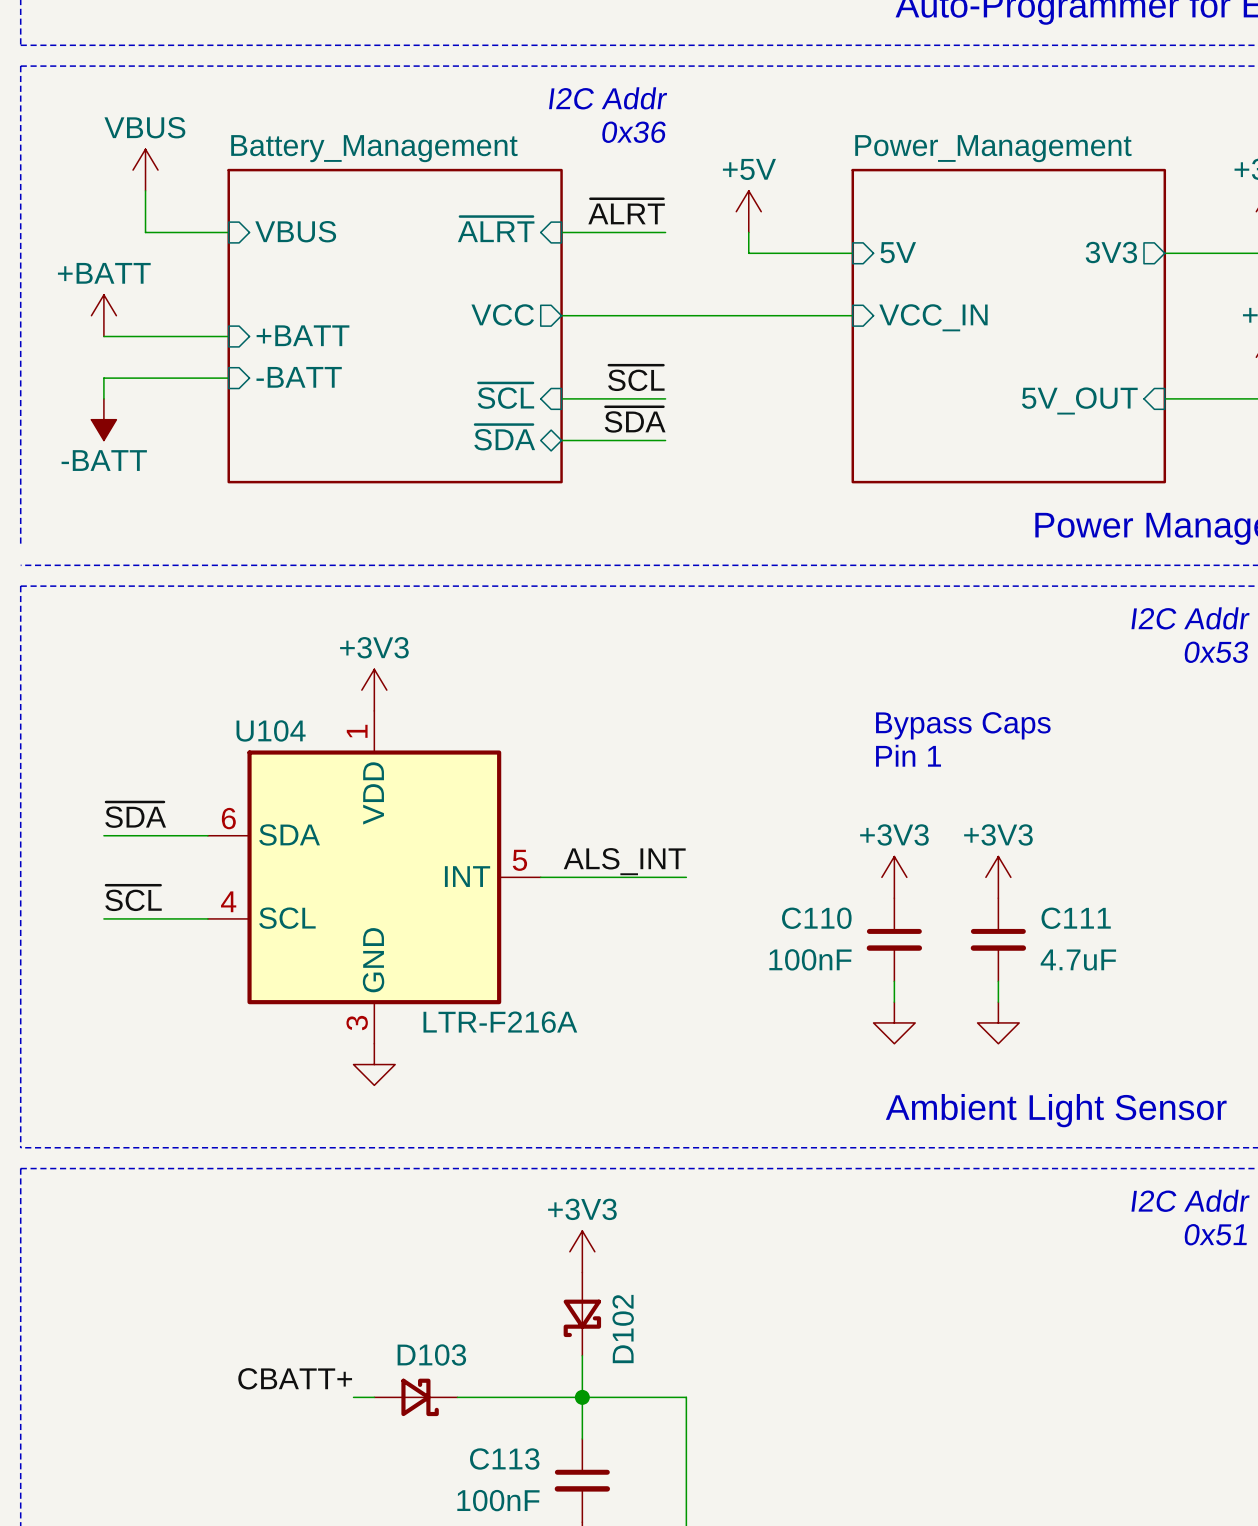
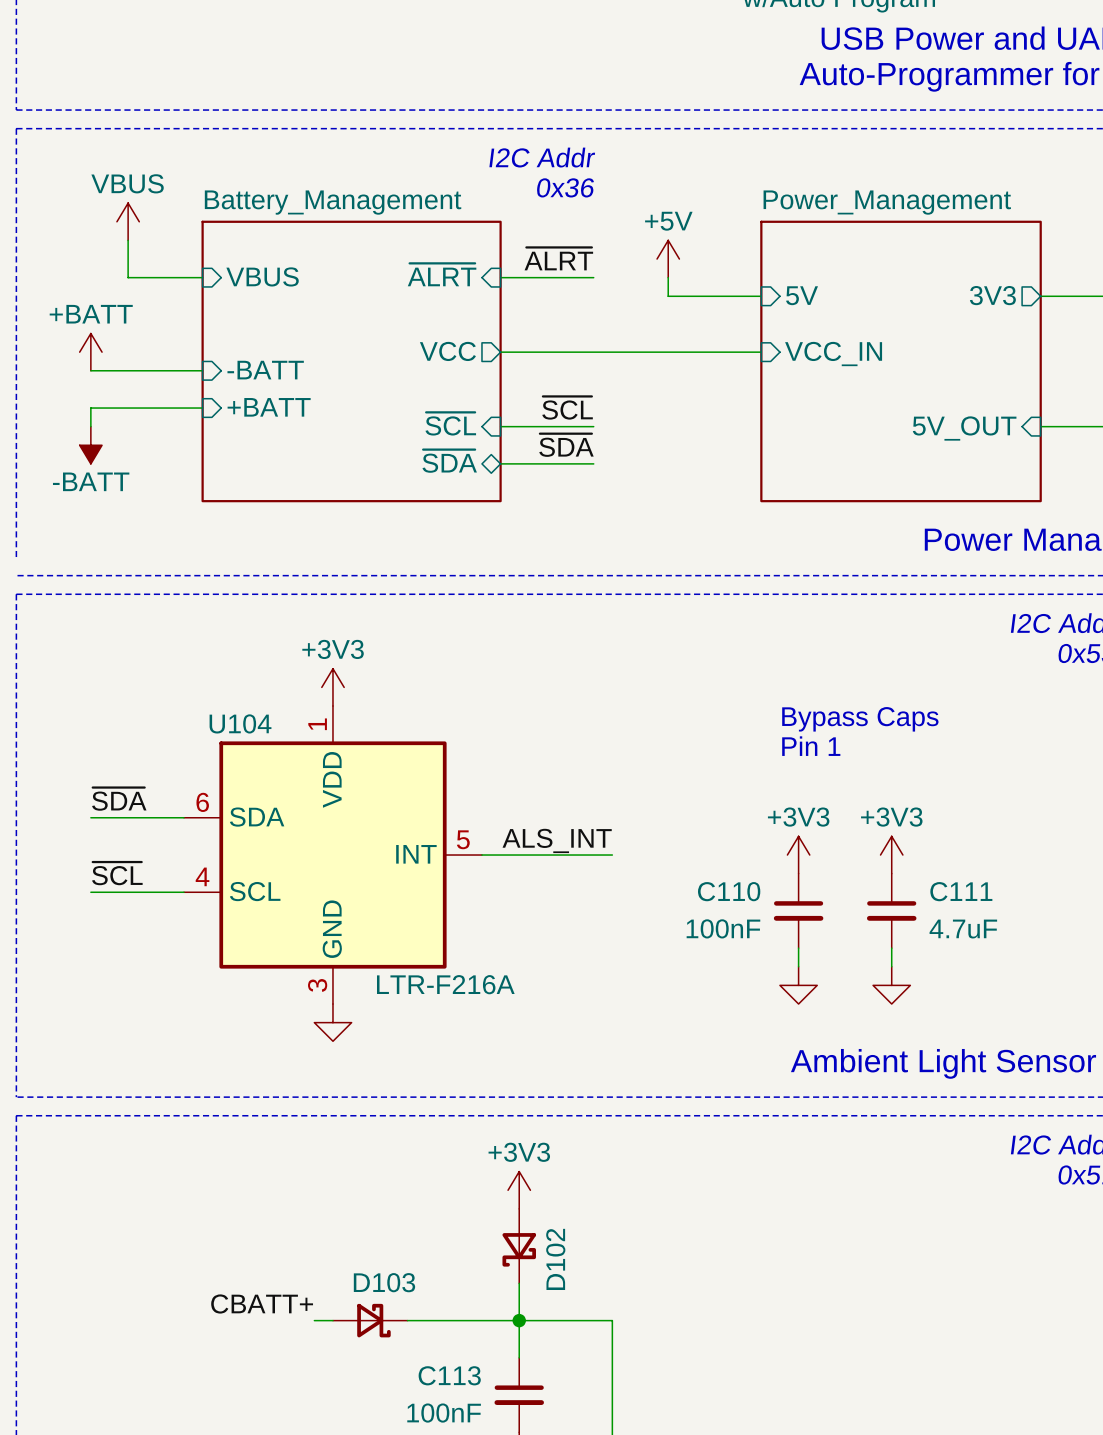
sheet pin: +BATT (303, 335) -> -BATT (265, 370)
sheet pin: -BATT (299, 377) -> +BATT (269, 407)

